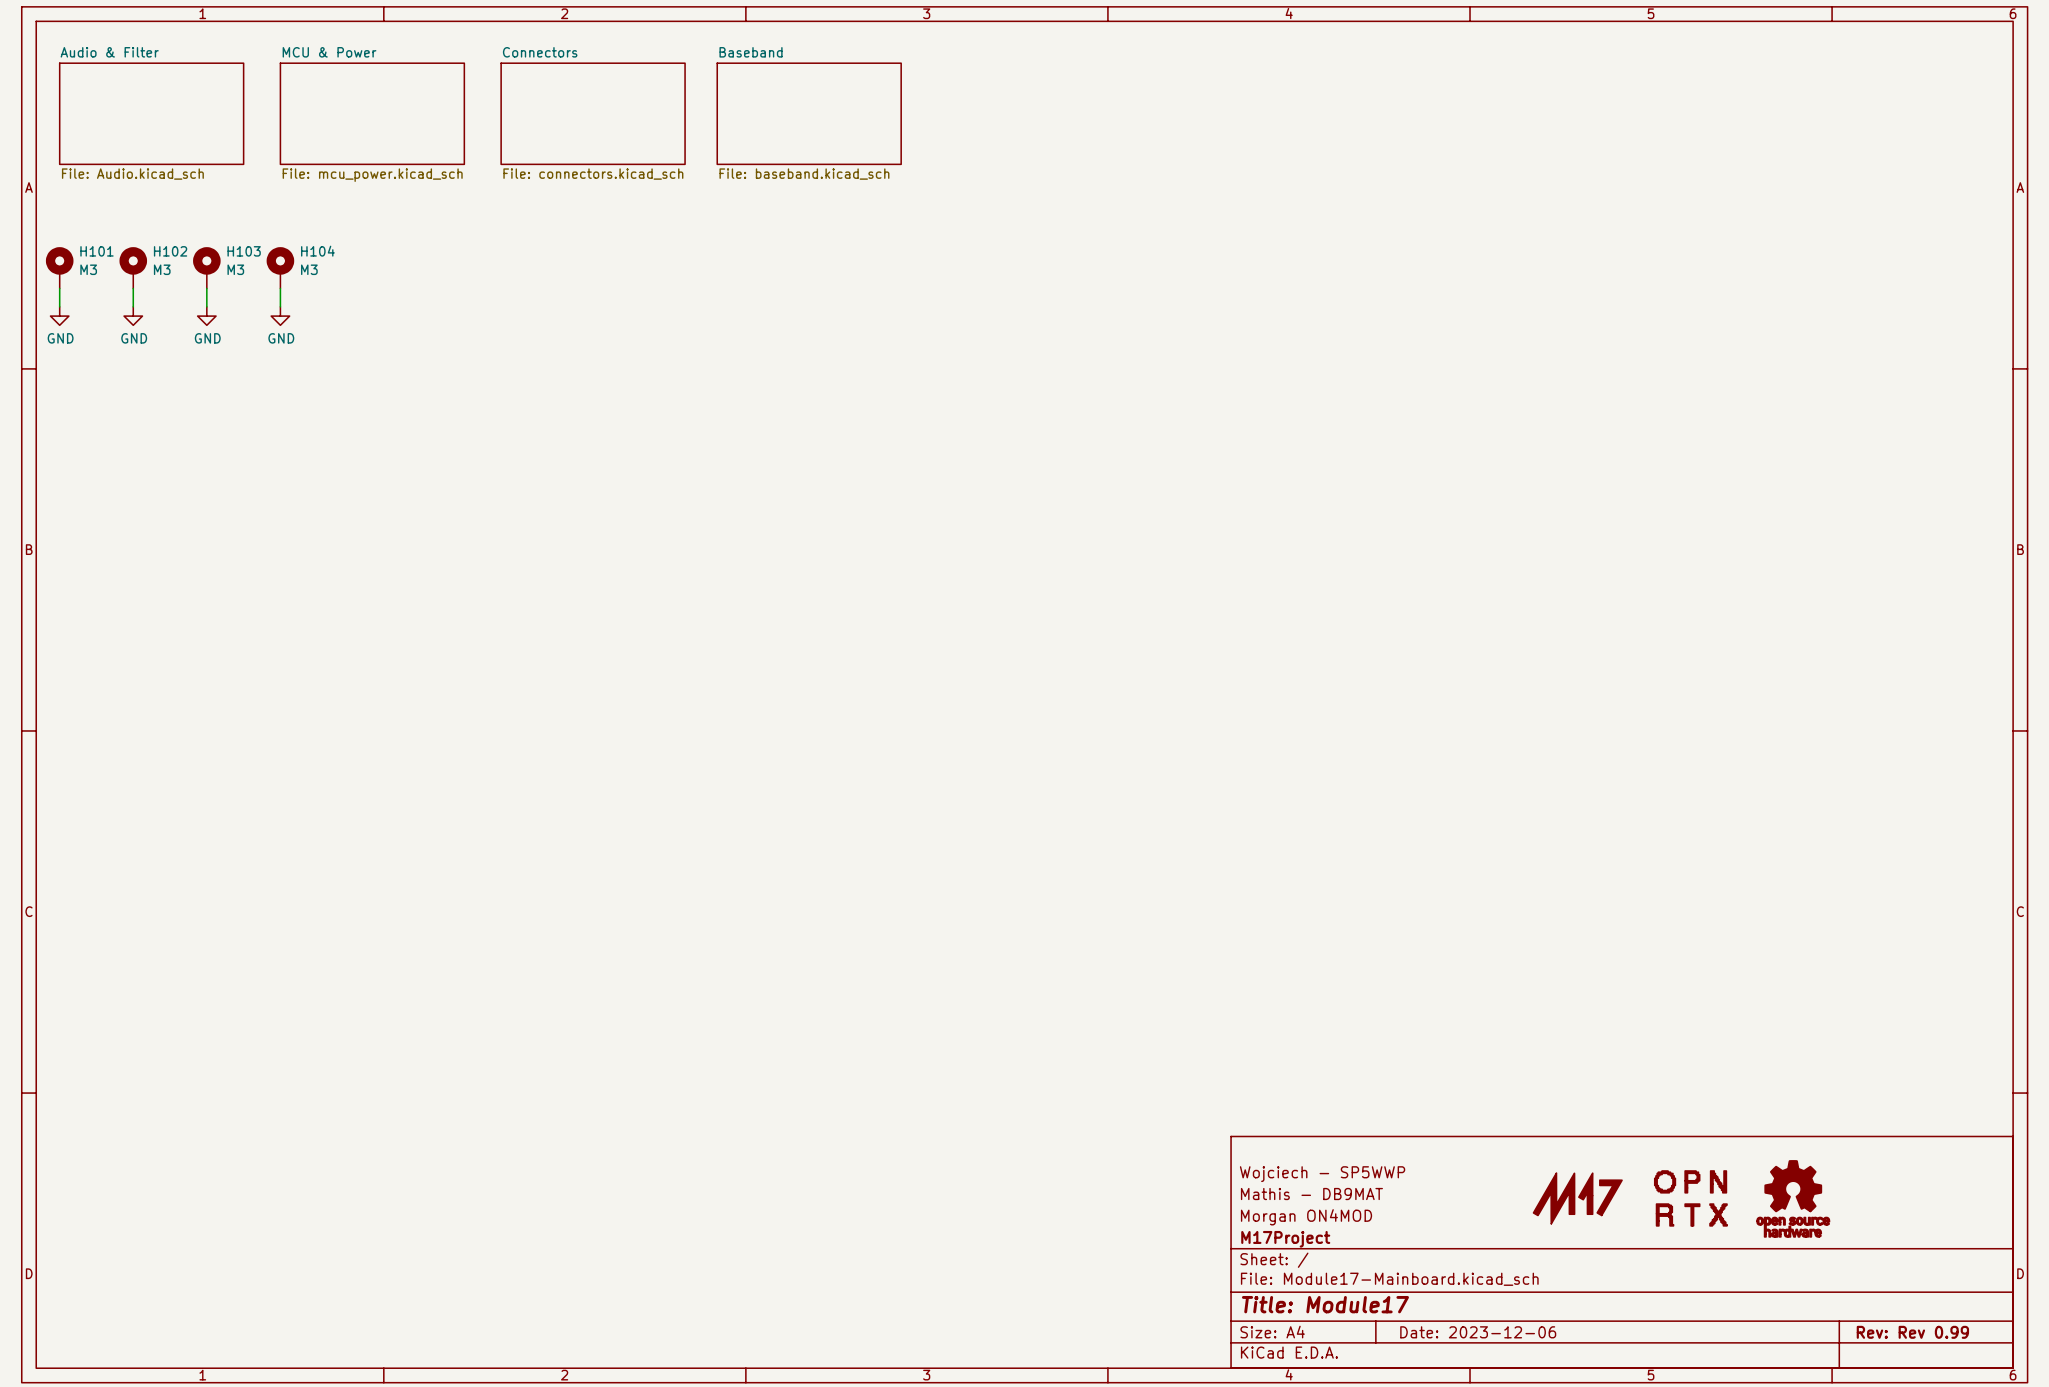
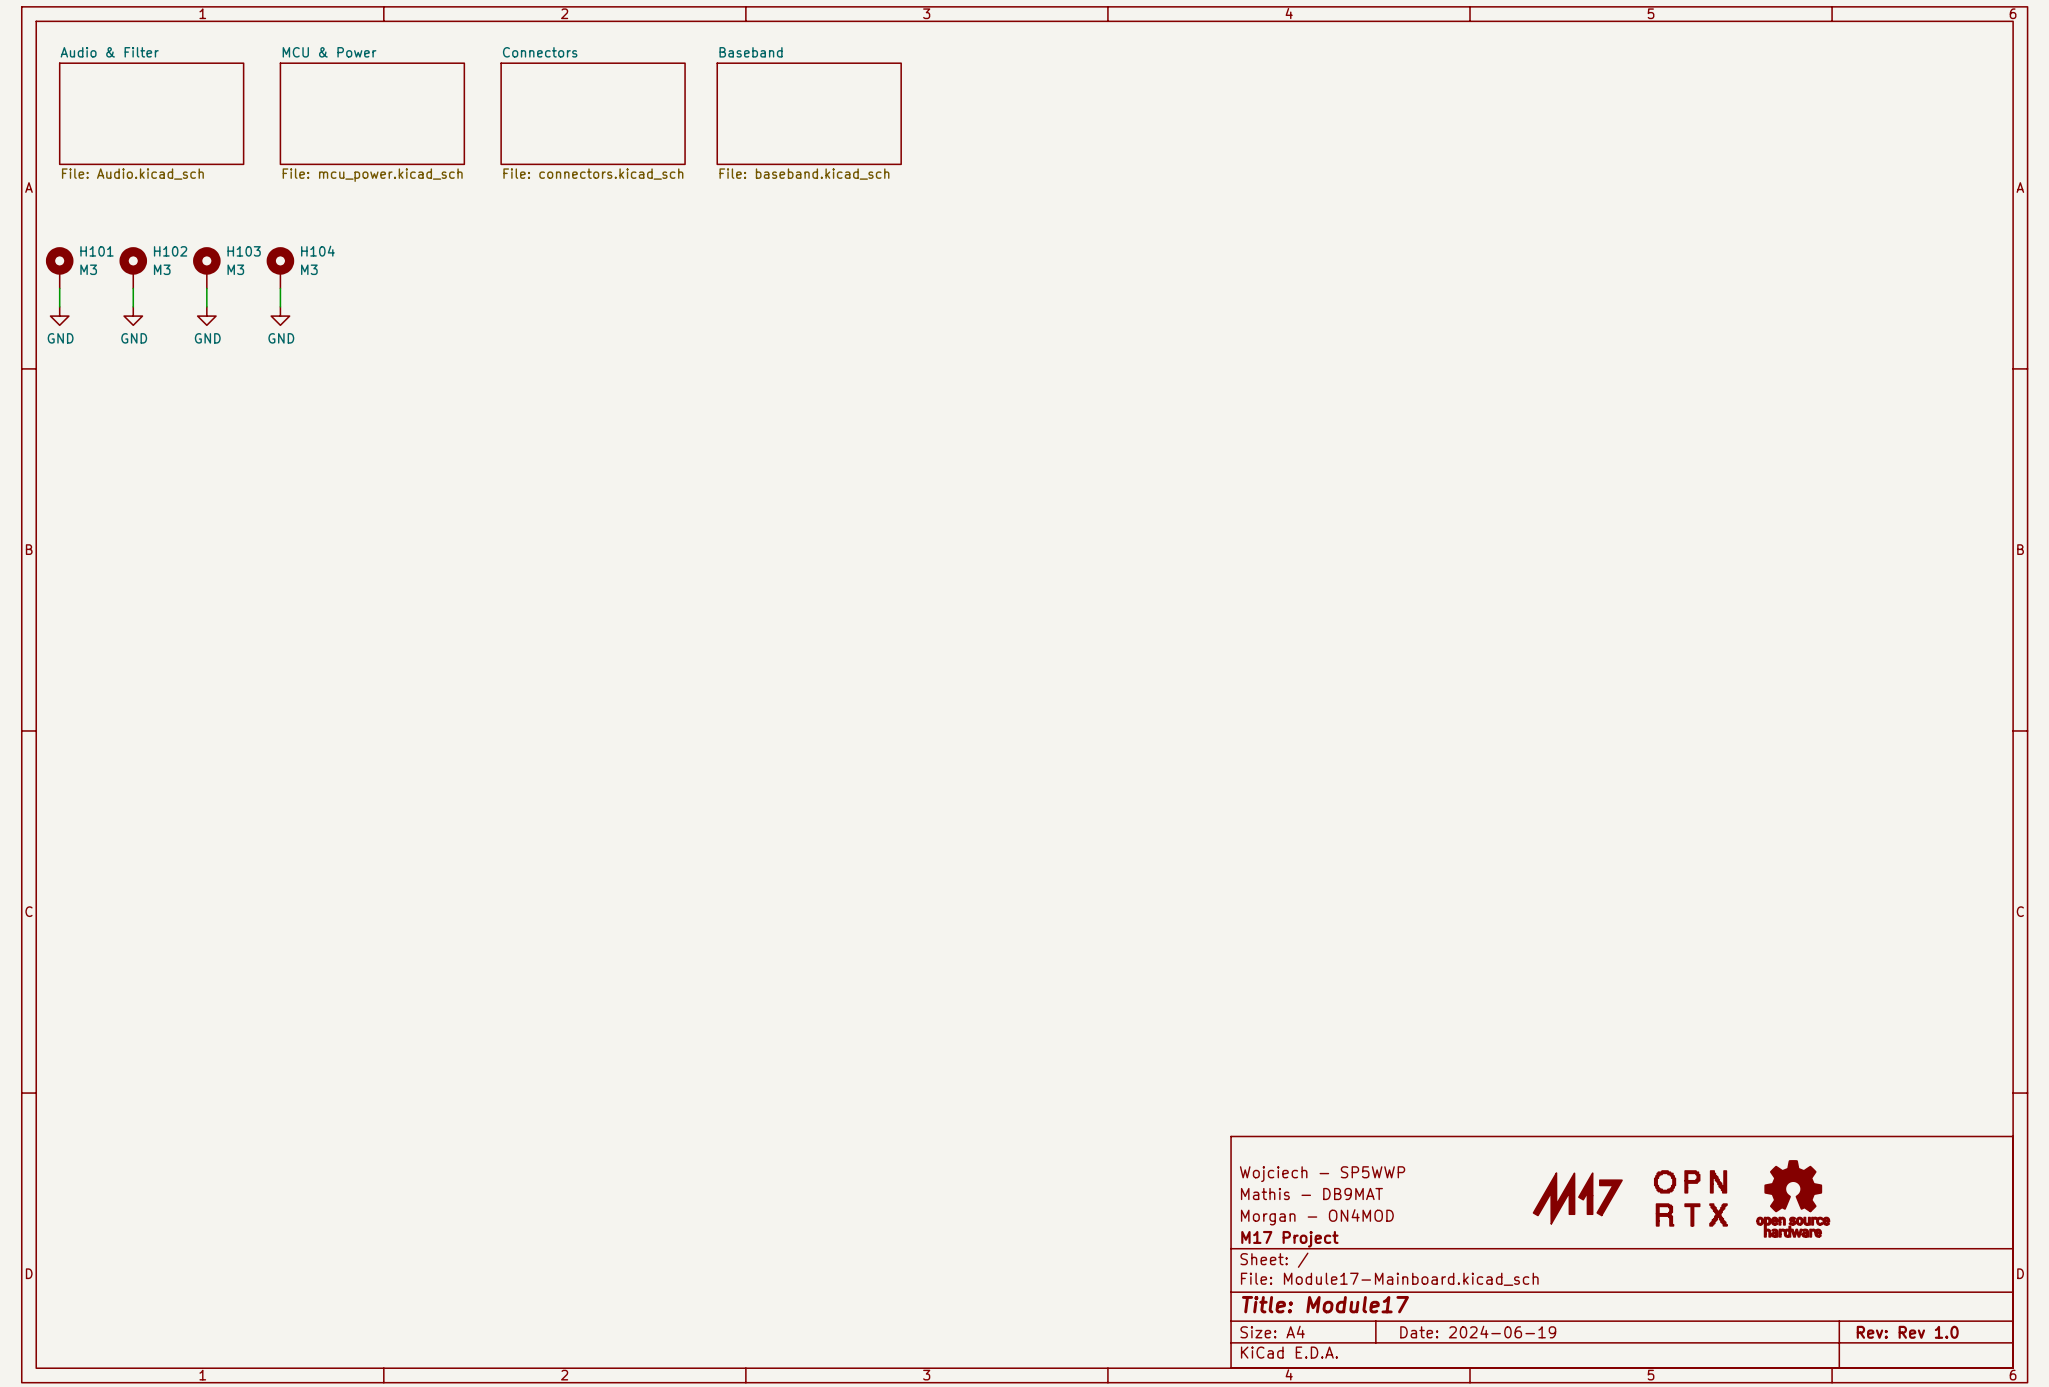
title block: Morgan ON4MOD (1306, 1217) -> Morgan - ON4MOD (1317, 1217)
title block: M17Project (1285, 1239) -> M17 Project (1289, 1239)
title block: Date: 2023-12-06 (1478, 1332) -> Date: 2024-06-19 (1478, 1332)
title block: Rev: Rev 0.99 (1912, 1332) -> Rev: Rev 1.0 (1907, 1332)

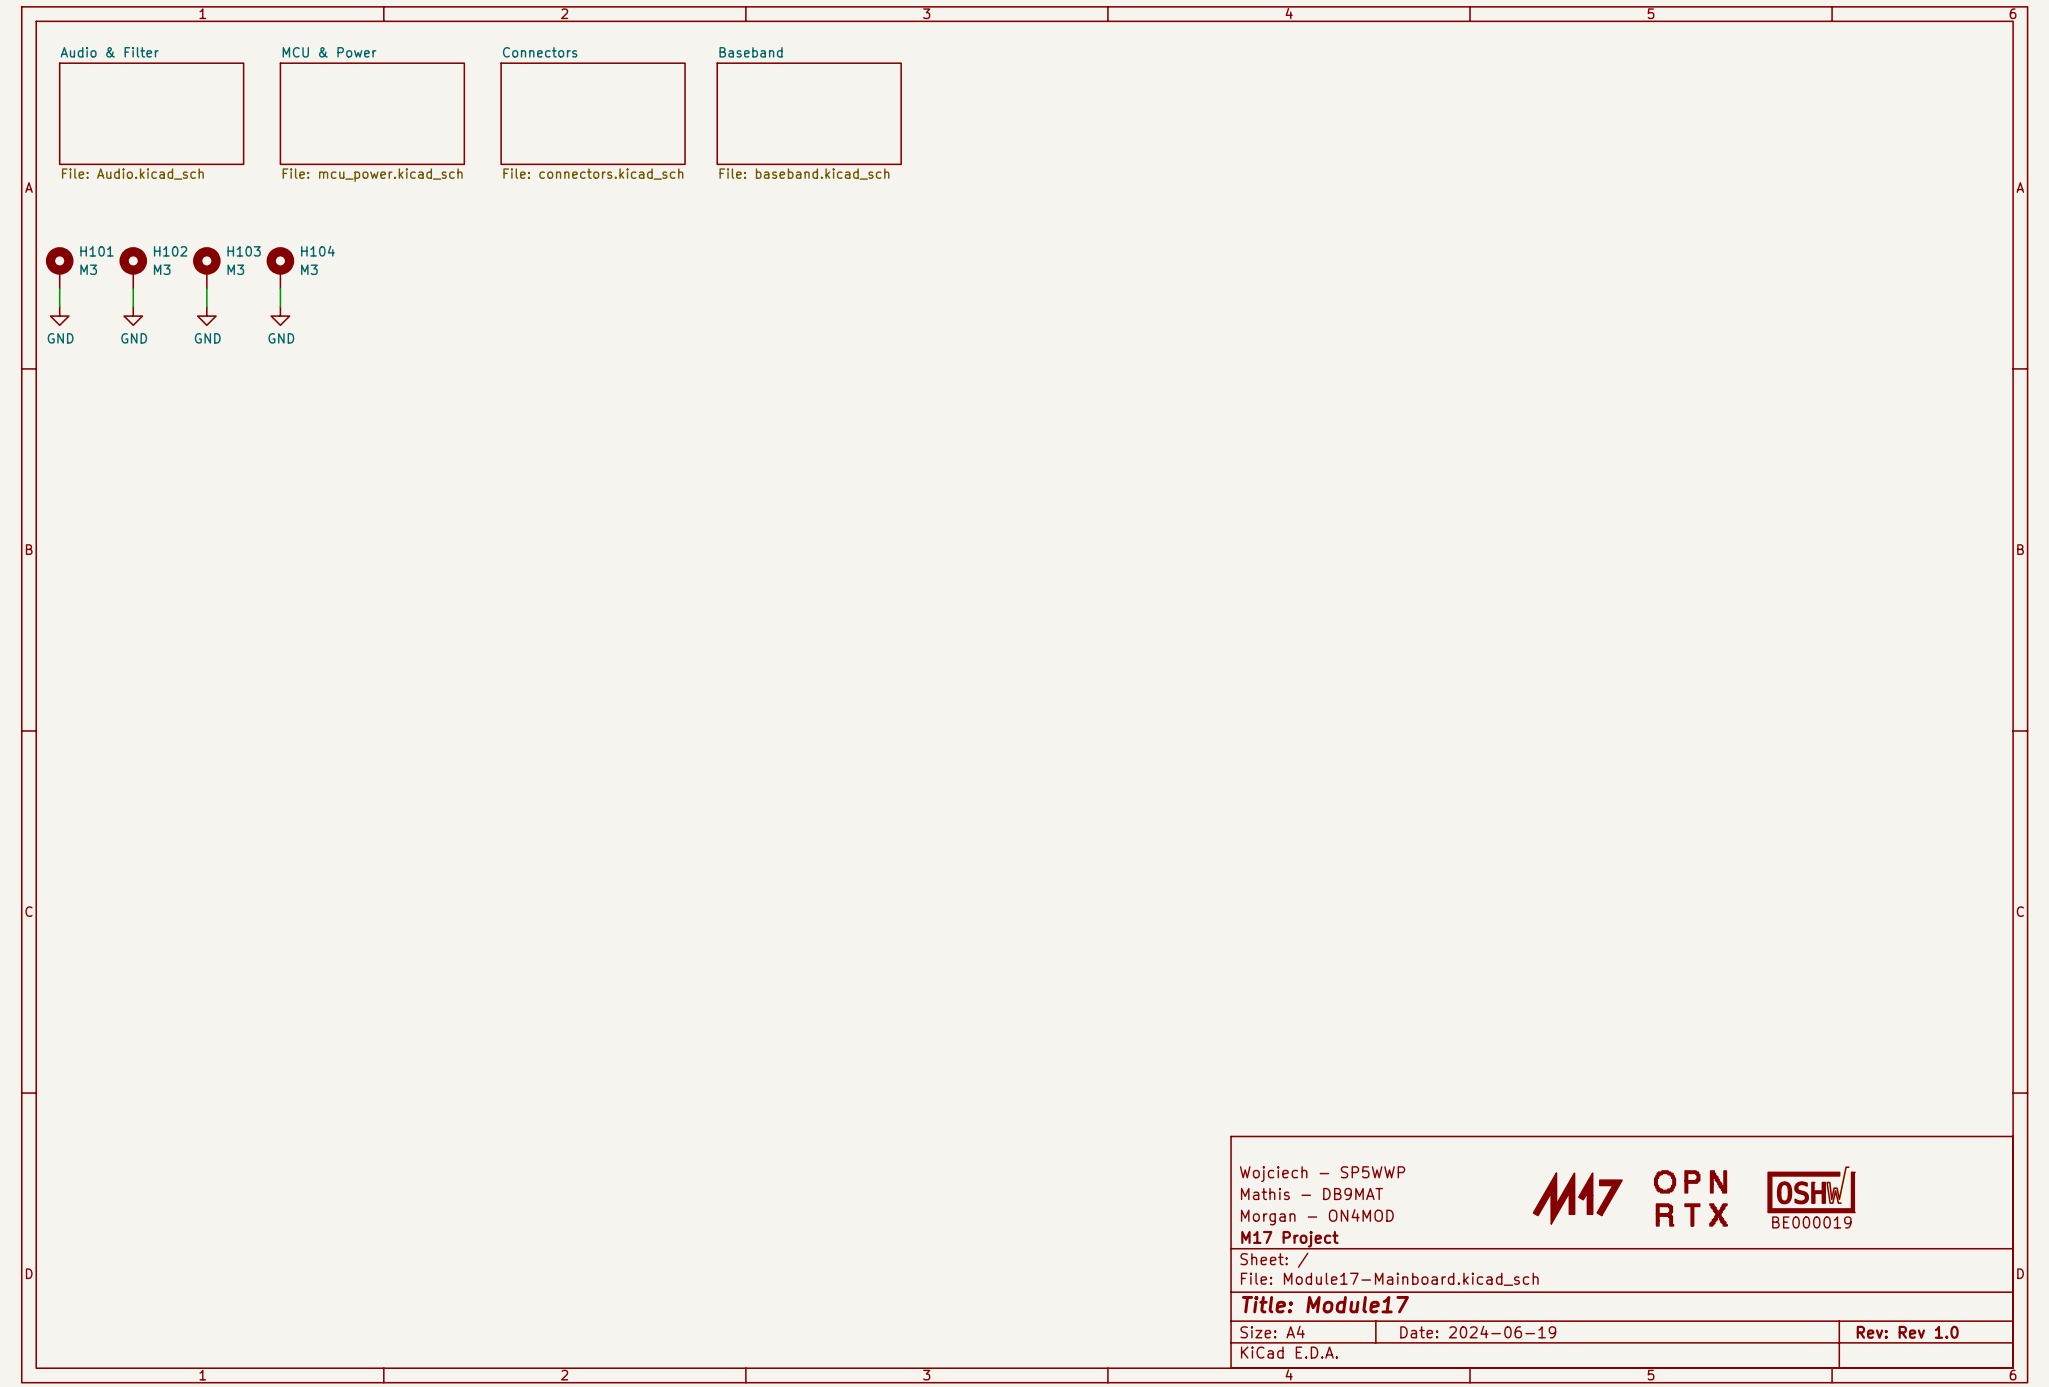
part: none -> (1811, 1189)
part: (1793, 1198) -> none

